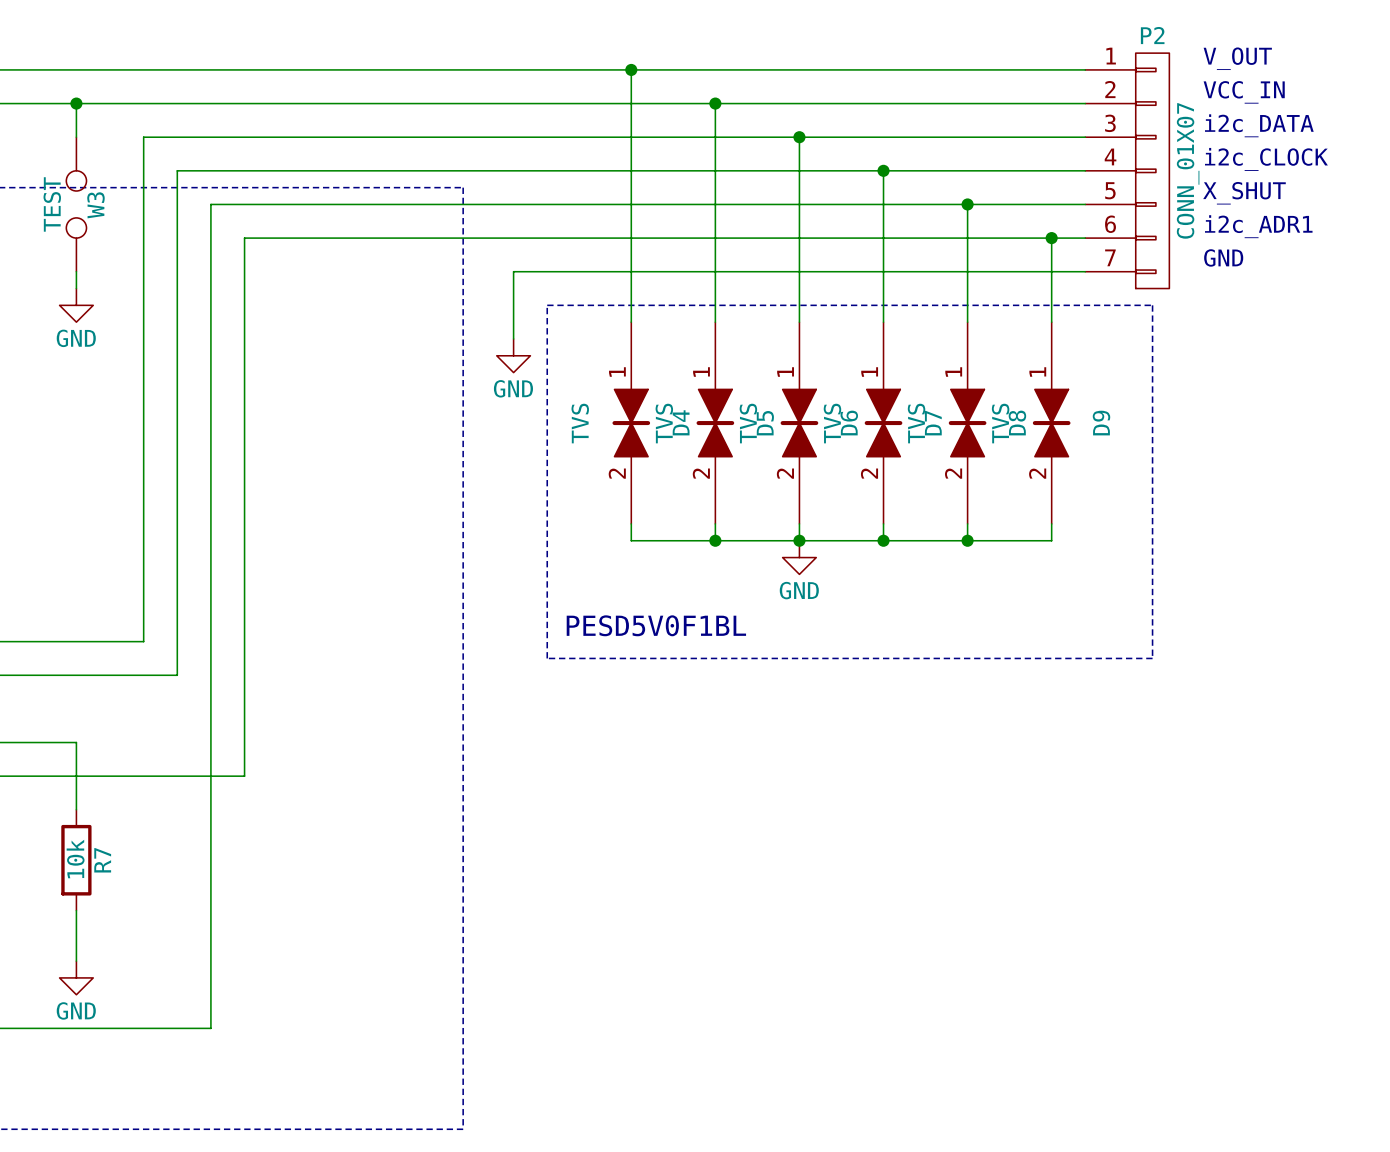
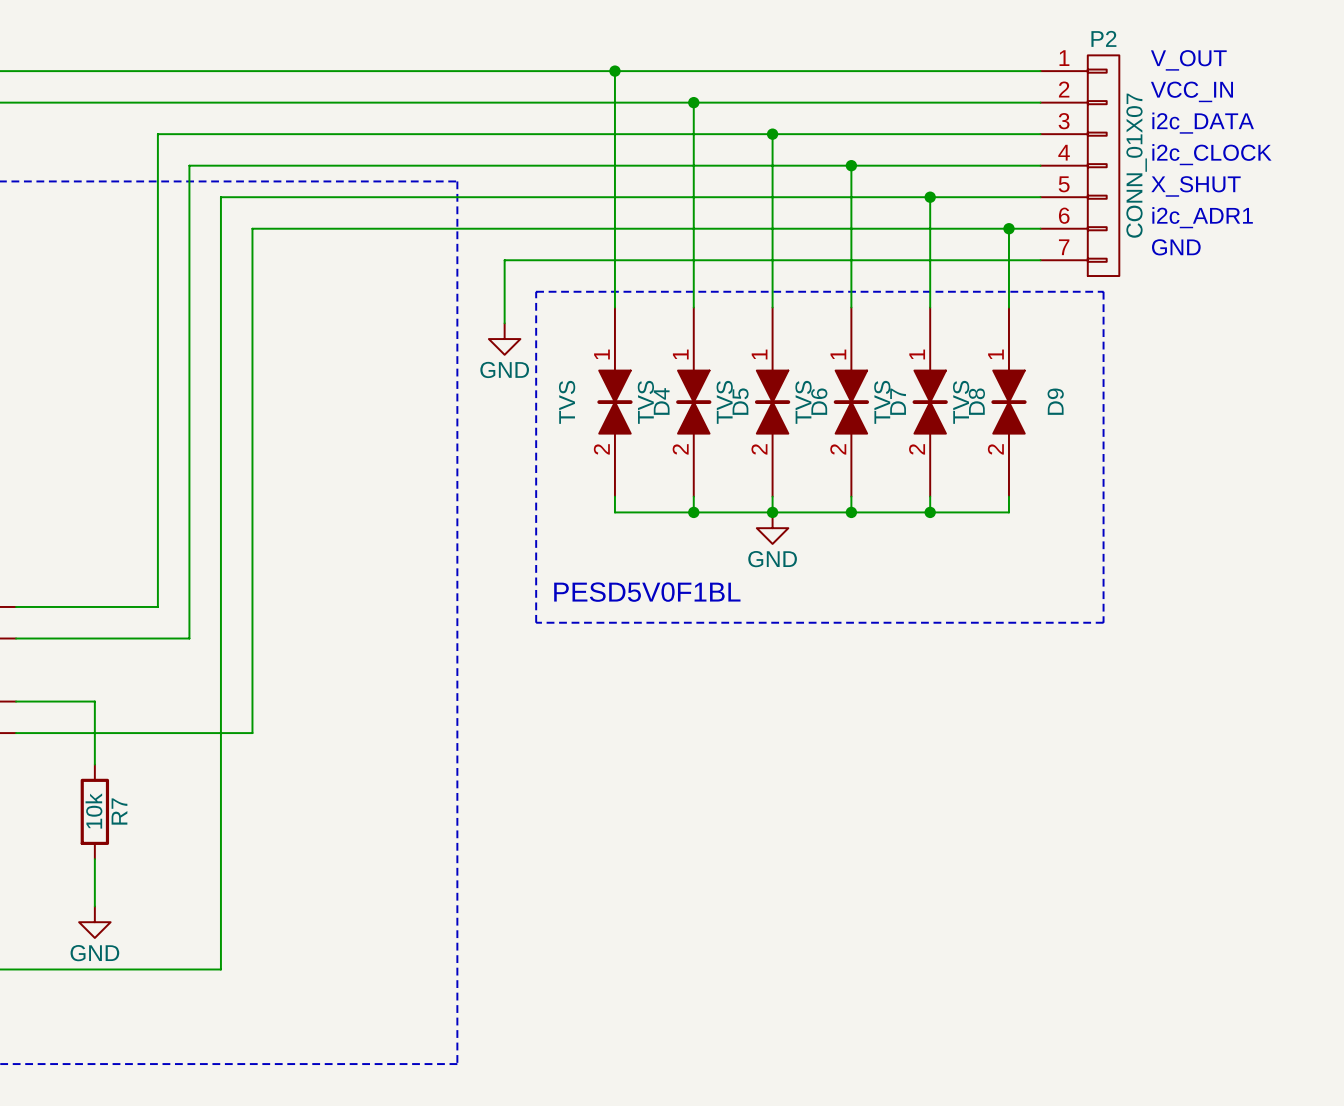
wire: (76, 103) (76, 137) -> none
junction: (76, 103) -> none
W3: TEST (76, 204) -> none
wire: (76, 271) (76, 288) -> none
power symbol: GND (76, 305) -> none

